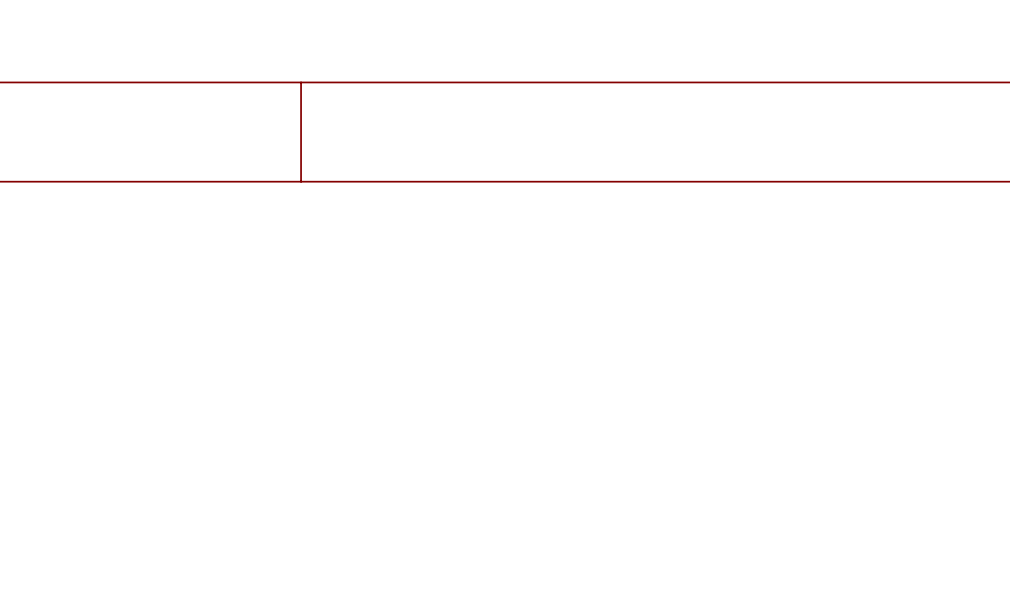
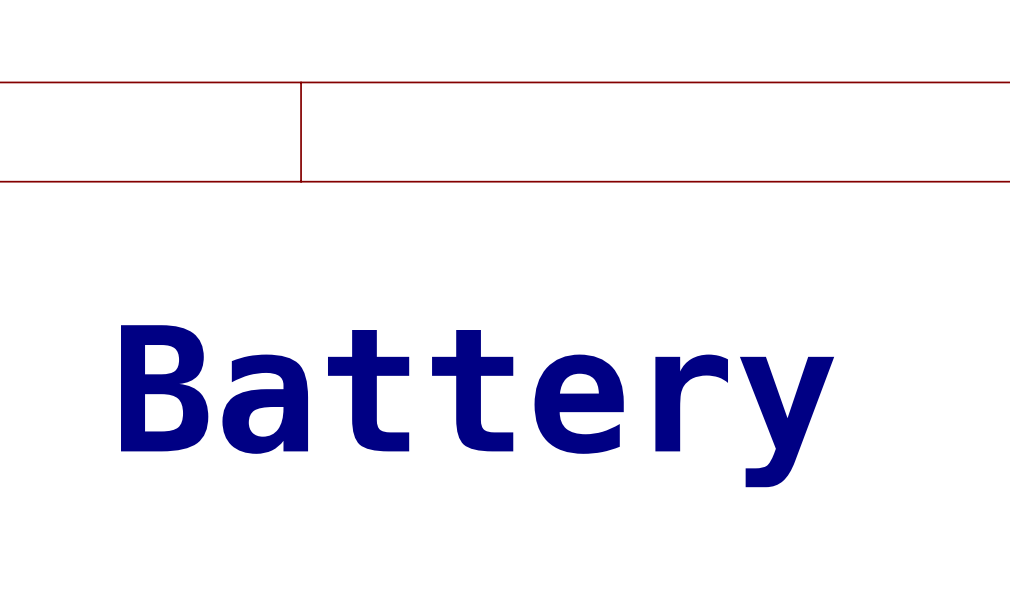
text: none -> Battery (477, 406)

